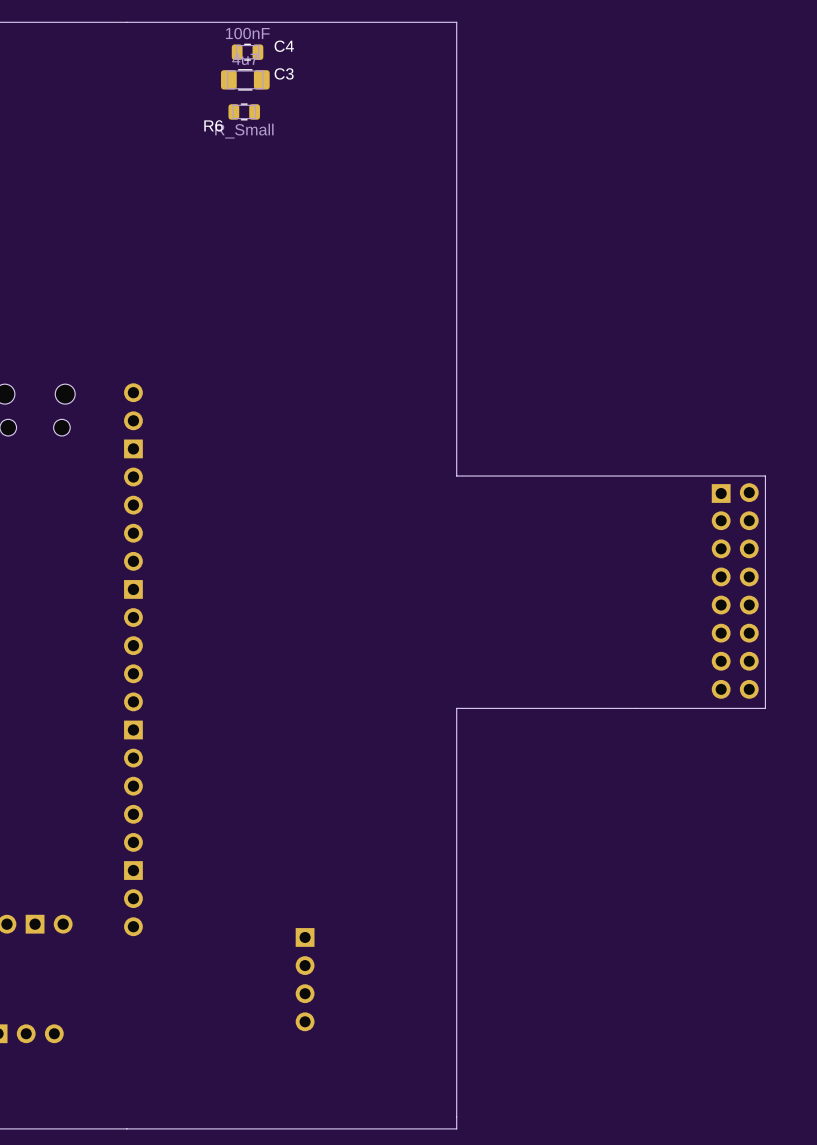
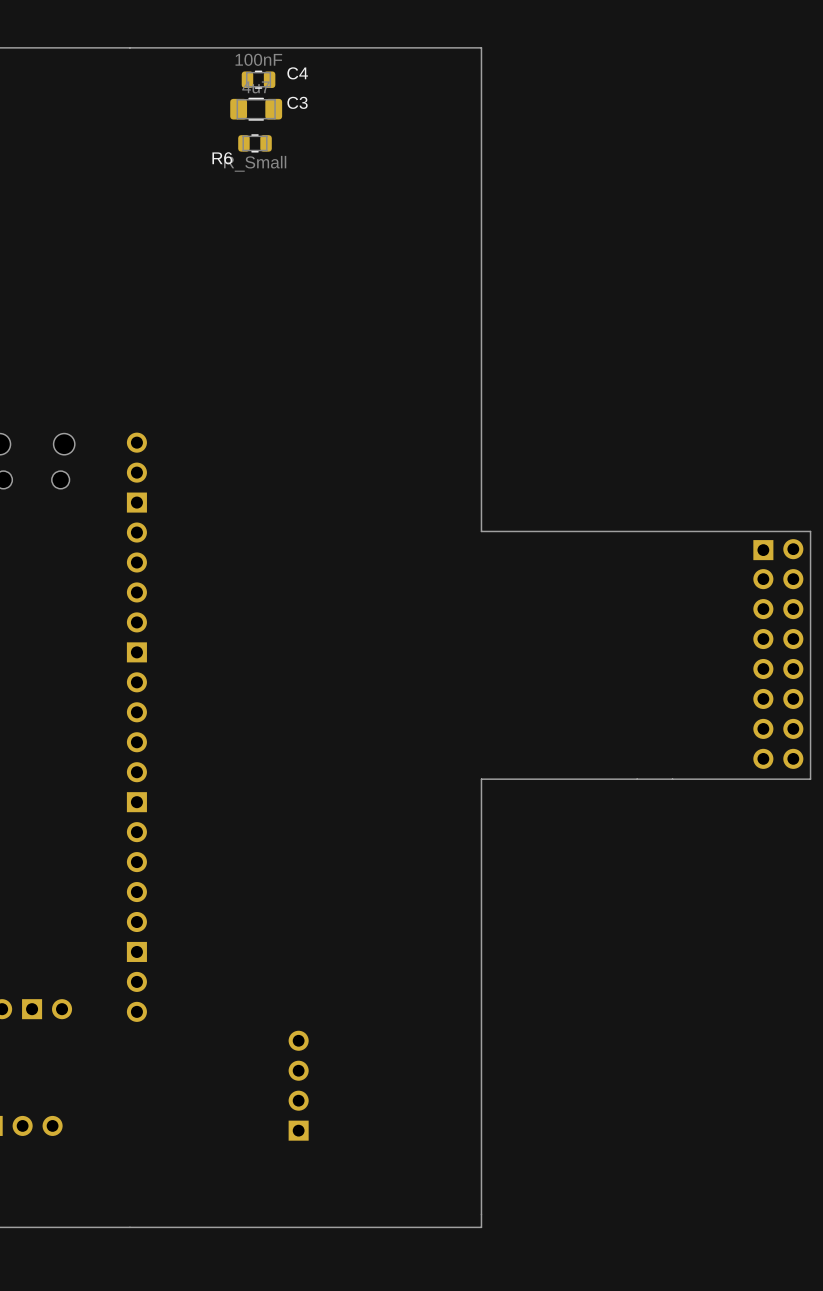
part rotation: 0° (305, 979) -> 180° (298, 1085)

